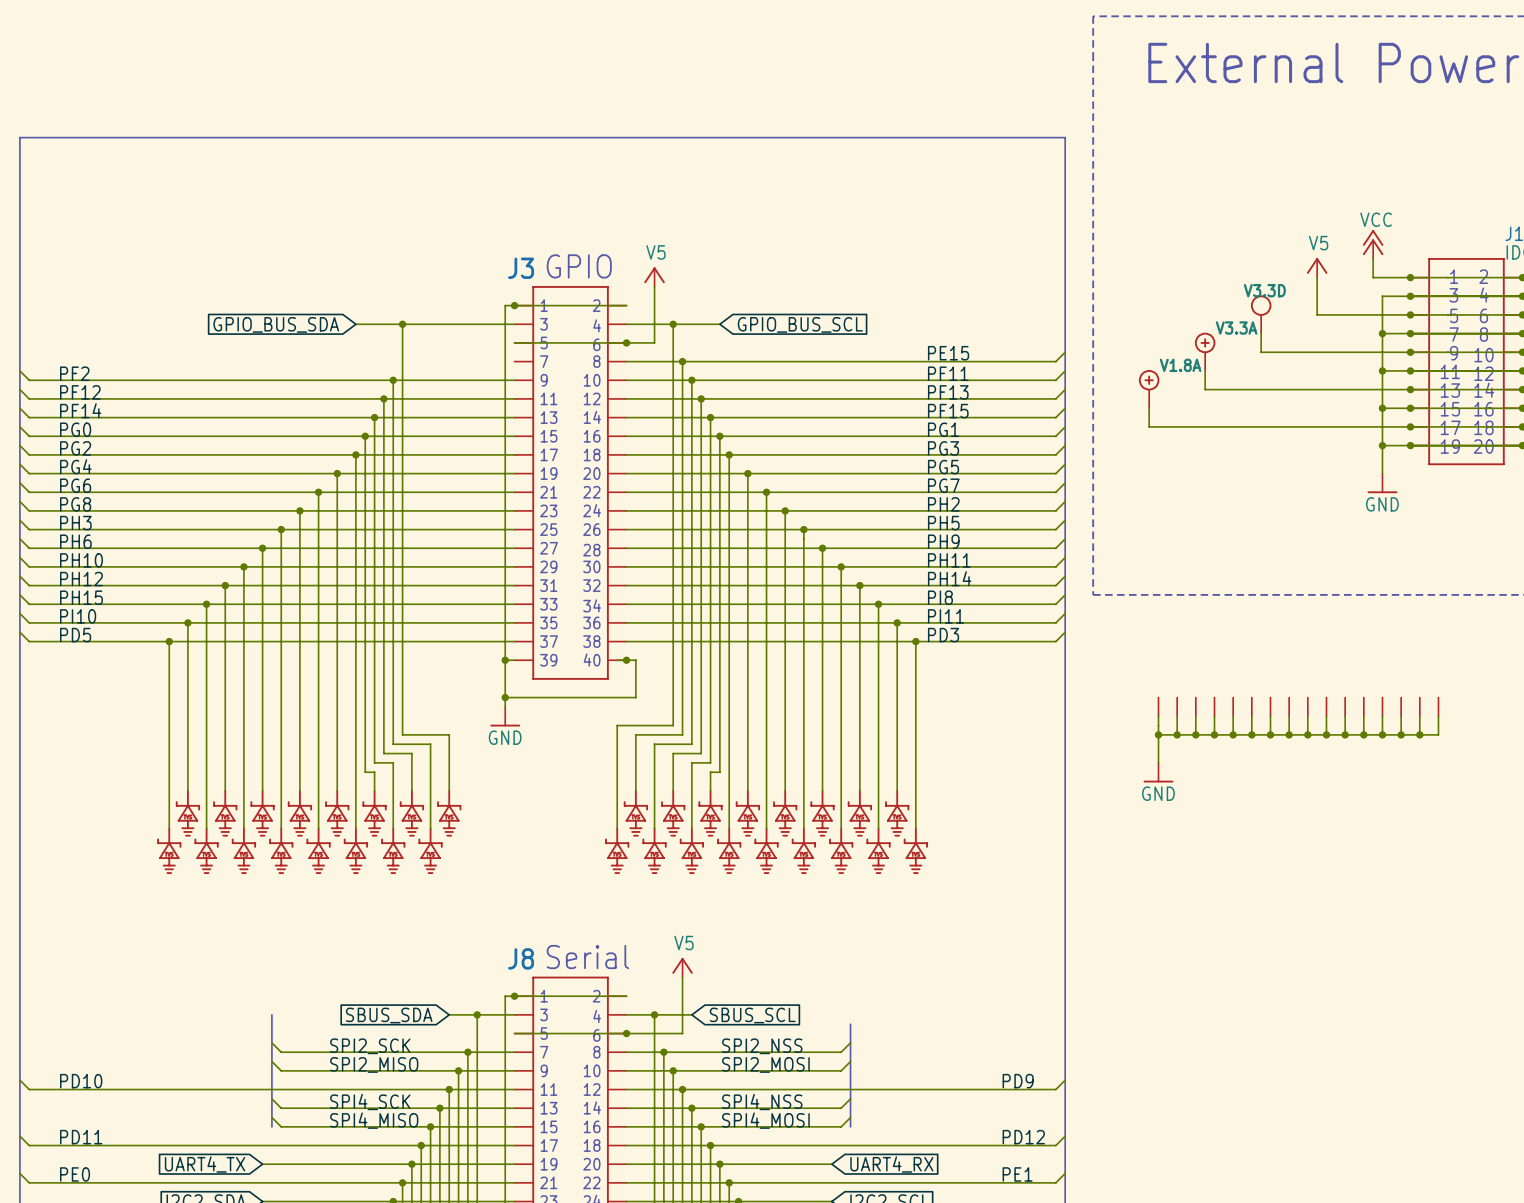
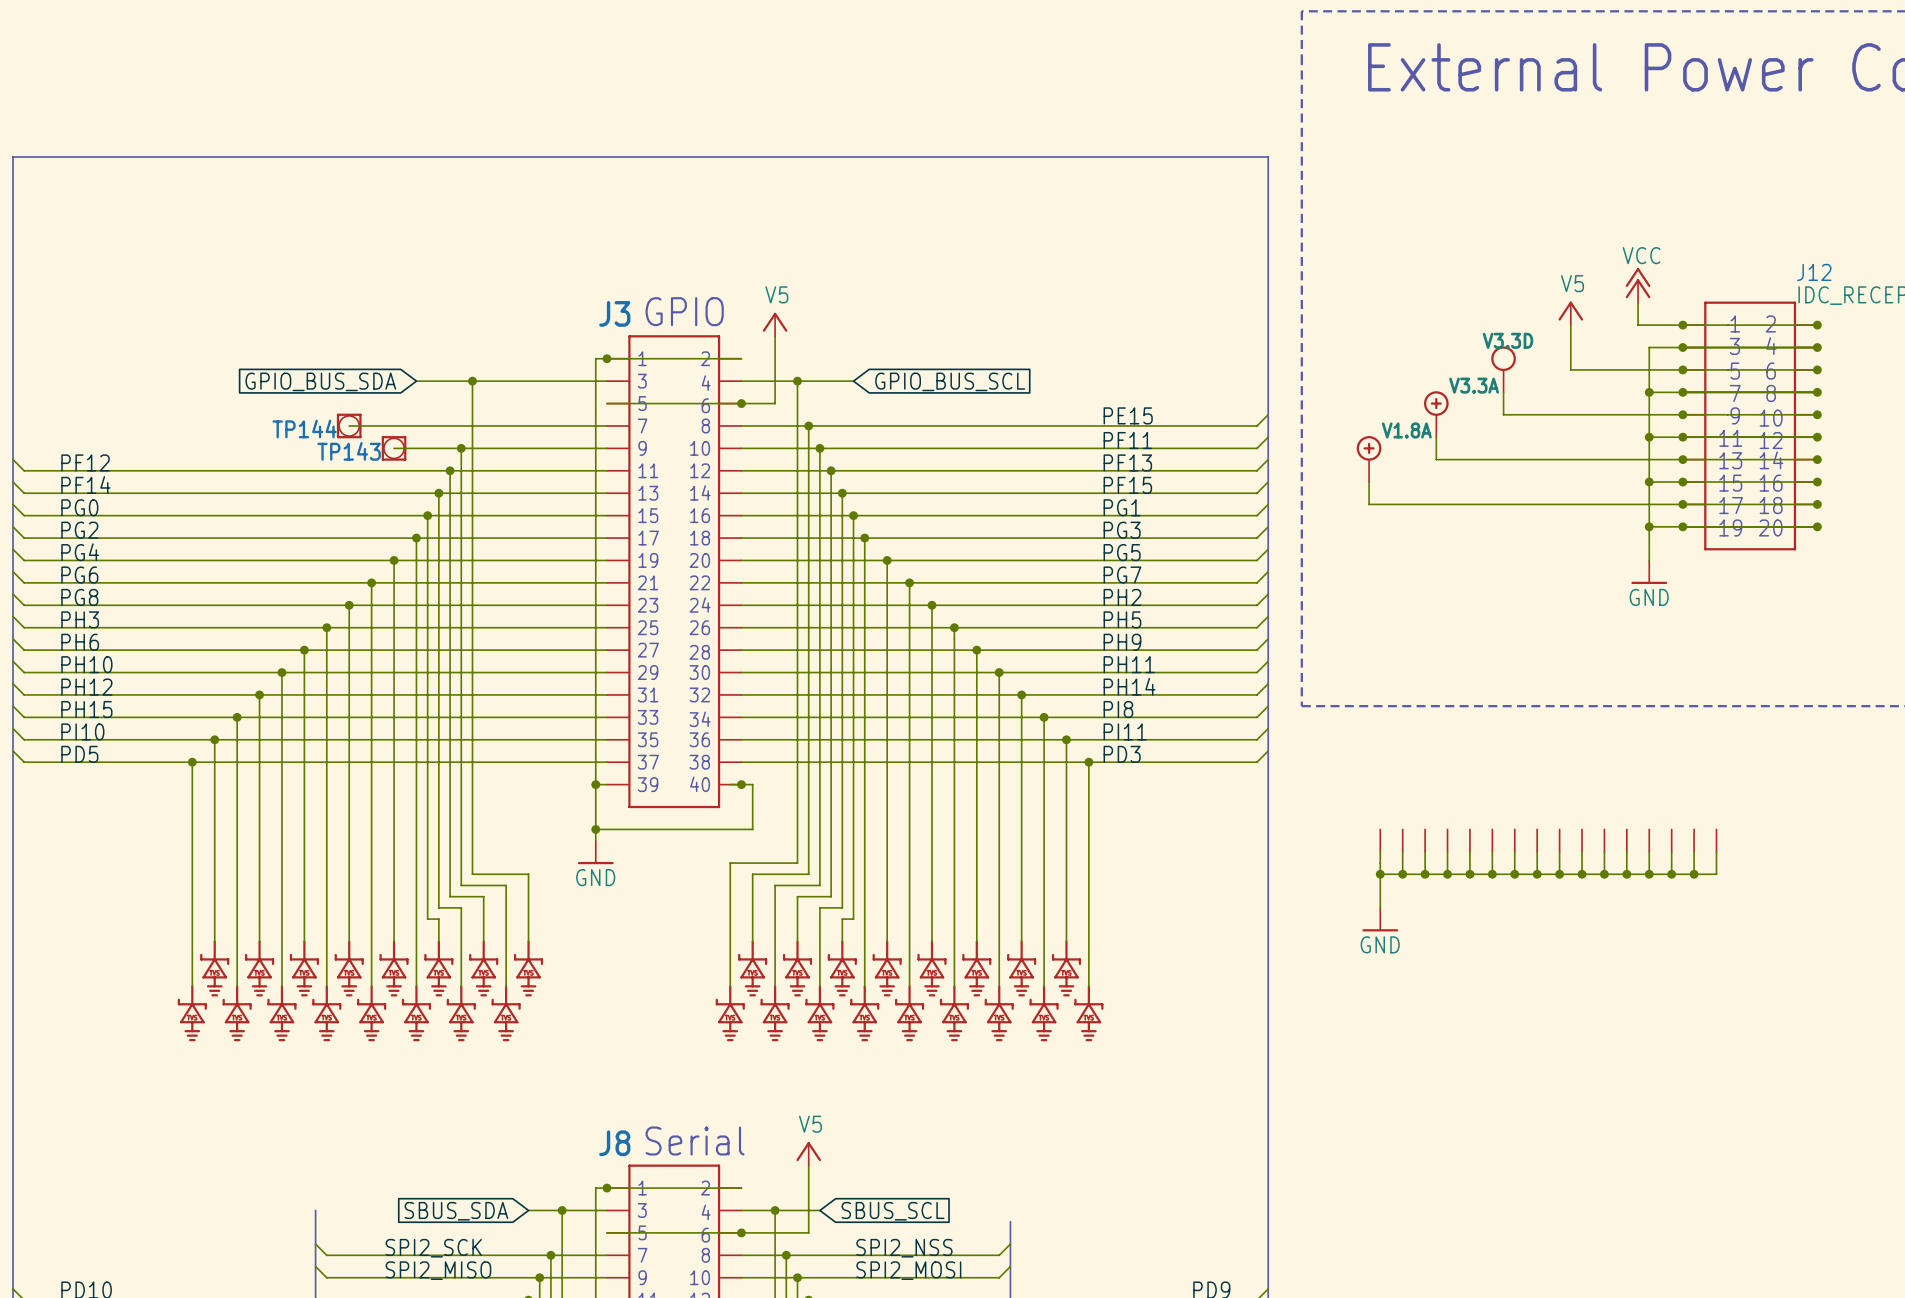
wire: none -> (349, 425) (606, 425)
TP144: none -> (349, 425)
wire: (19, 370) (29, 380) (337, 380) -> none
label: PF2 (74, 373) -> none
TP143: none -> (394, 448)

